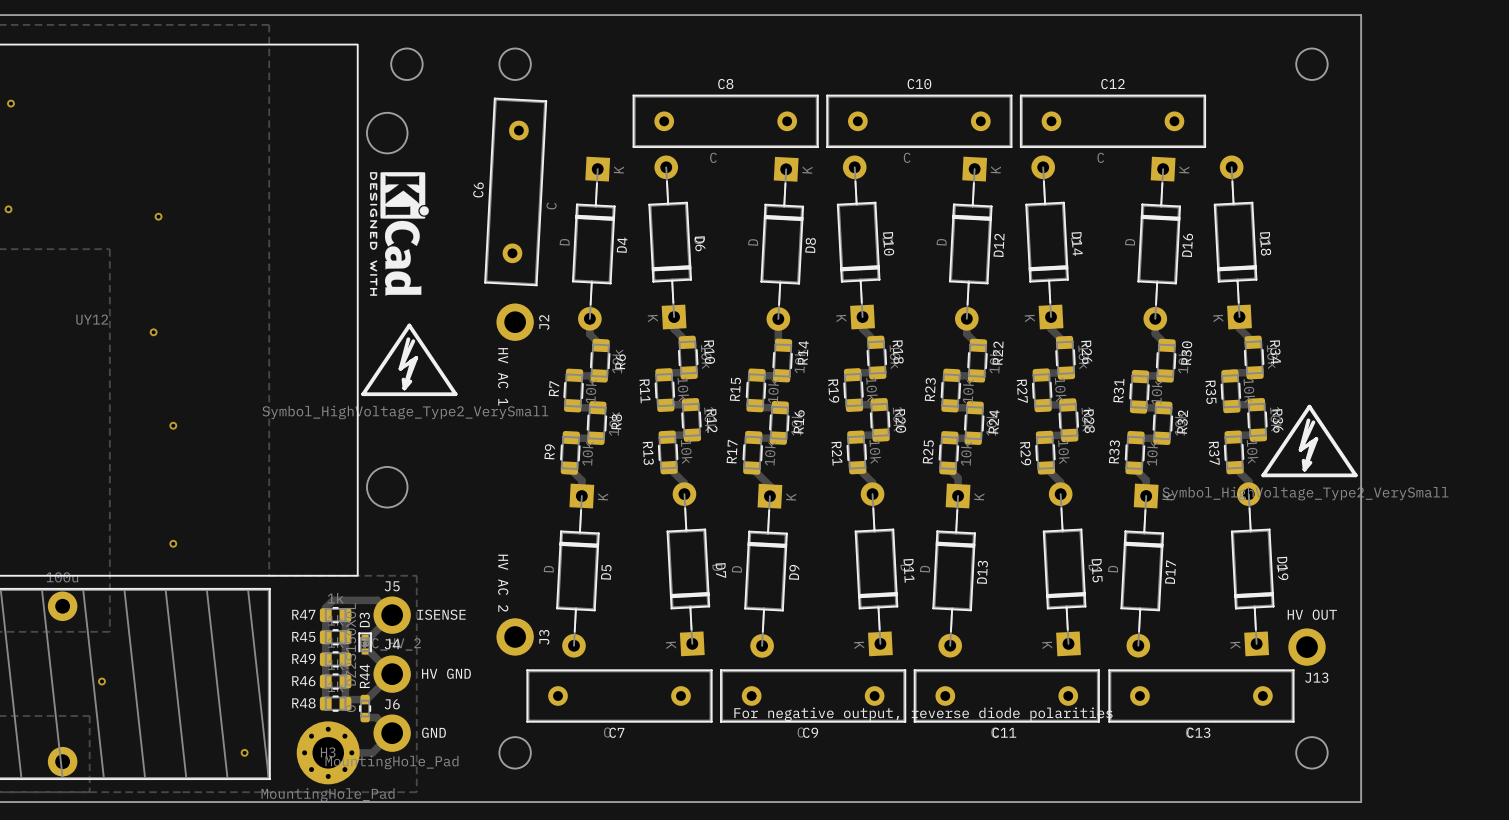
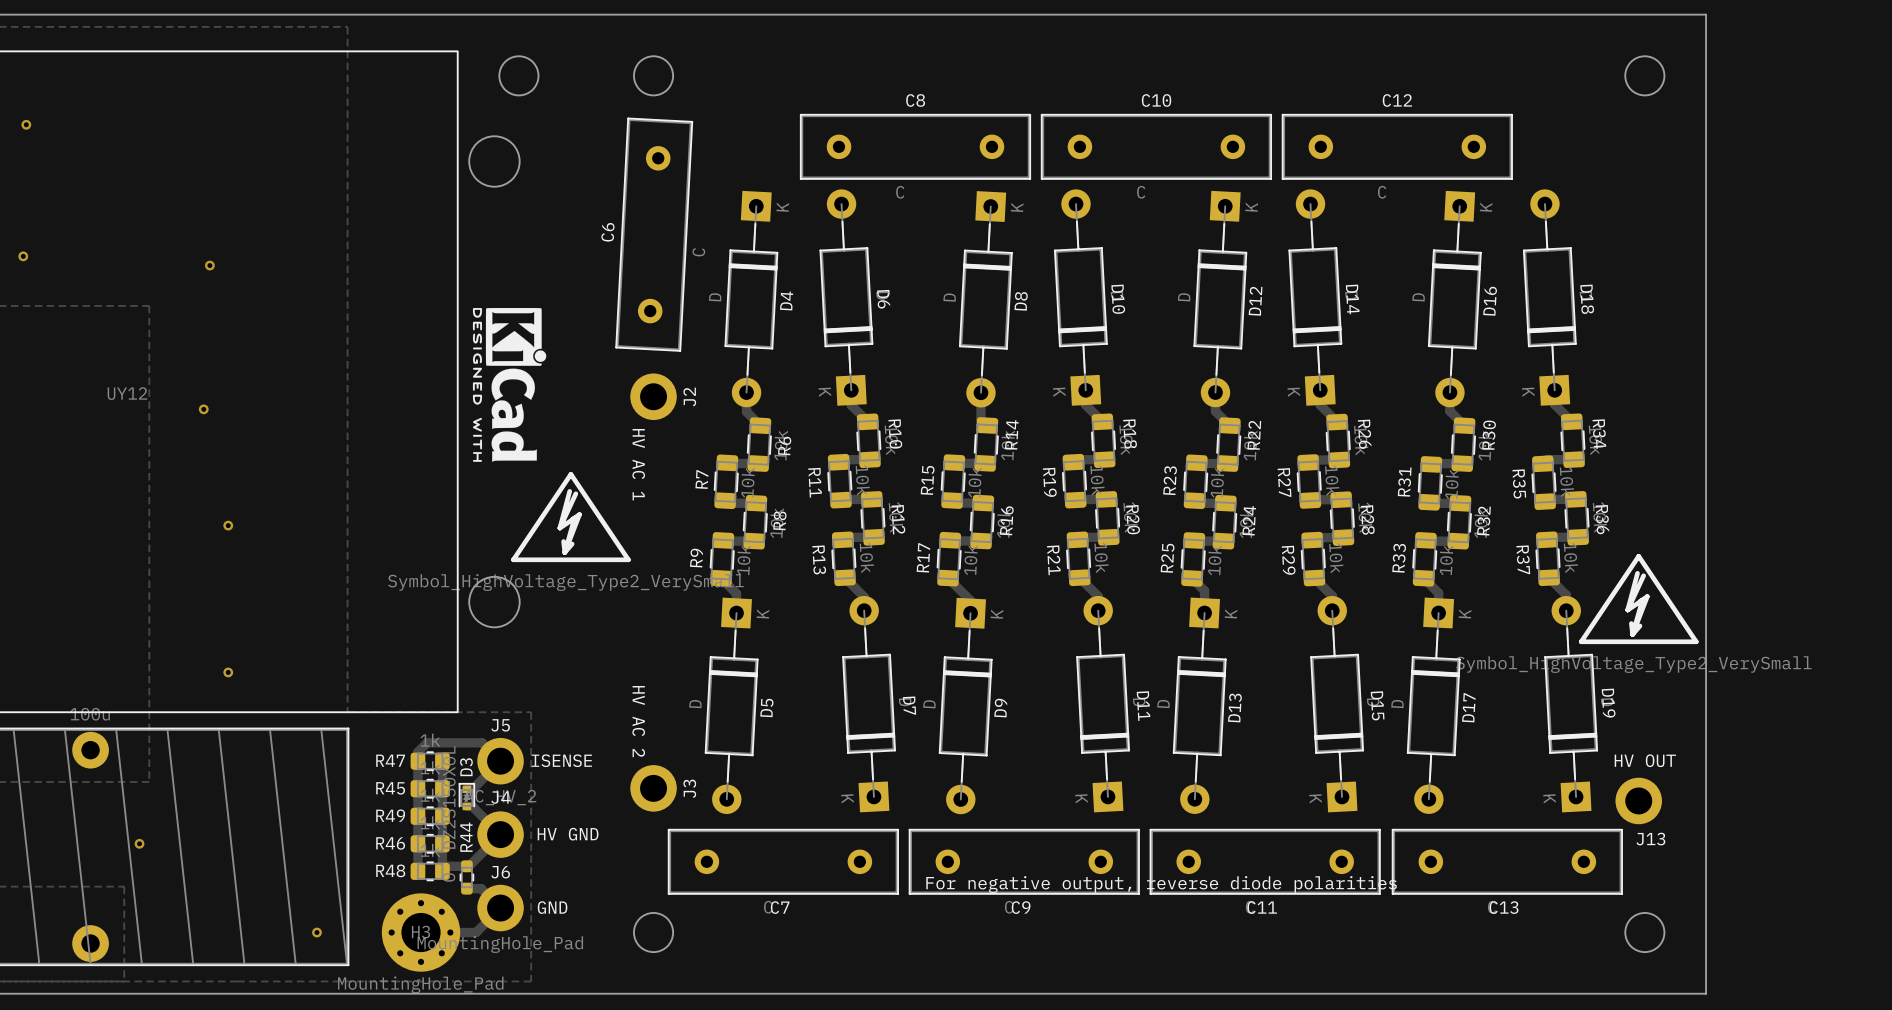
drawing position: (399, 233) -> (509, 384)
drawing position: (409, 359) -> (570, 517)
drawing position: (1309, 441) -> (1638, 599)

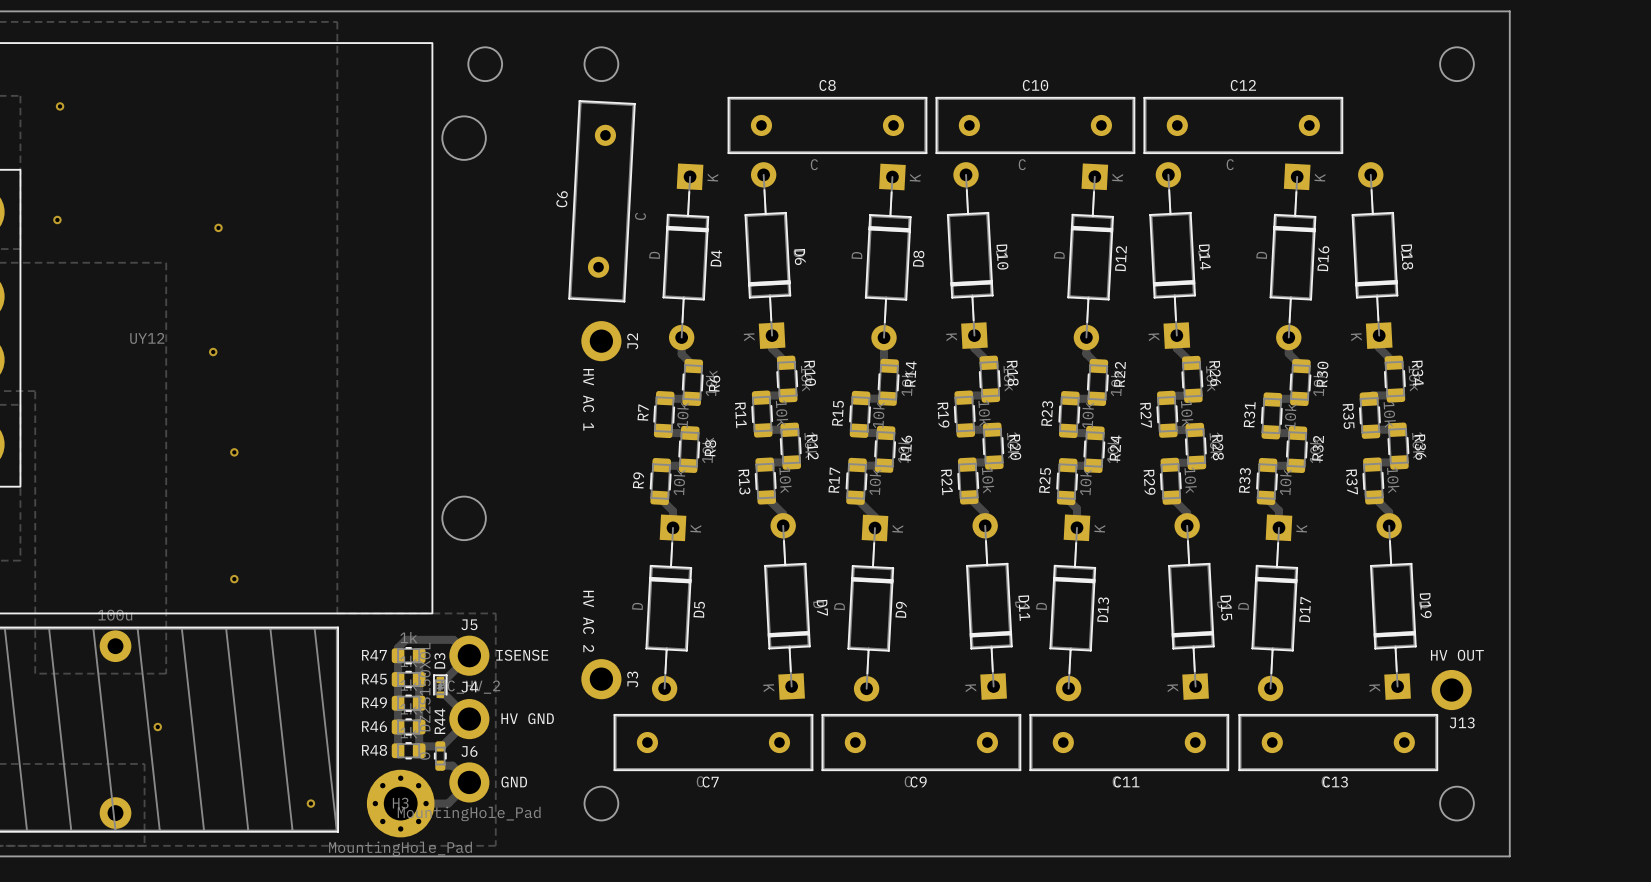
drawing: [472, 307, 631, 563] -> none
drawing: [1578, 553, 1699, 645] -> none
text: For negative output, reverse diode polarities (1161, 884) -> none

